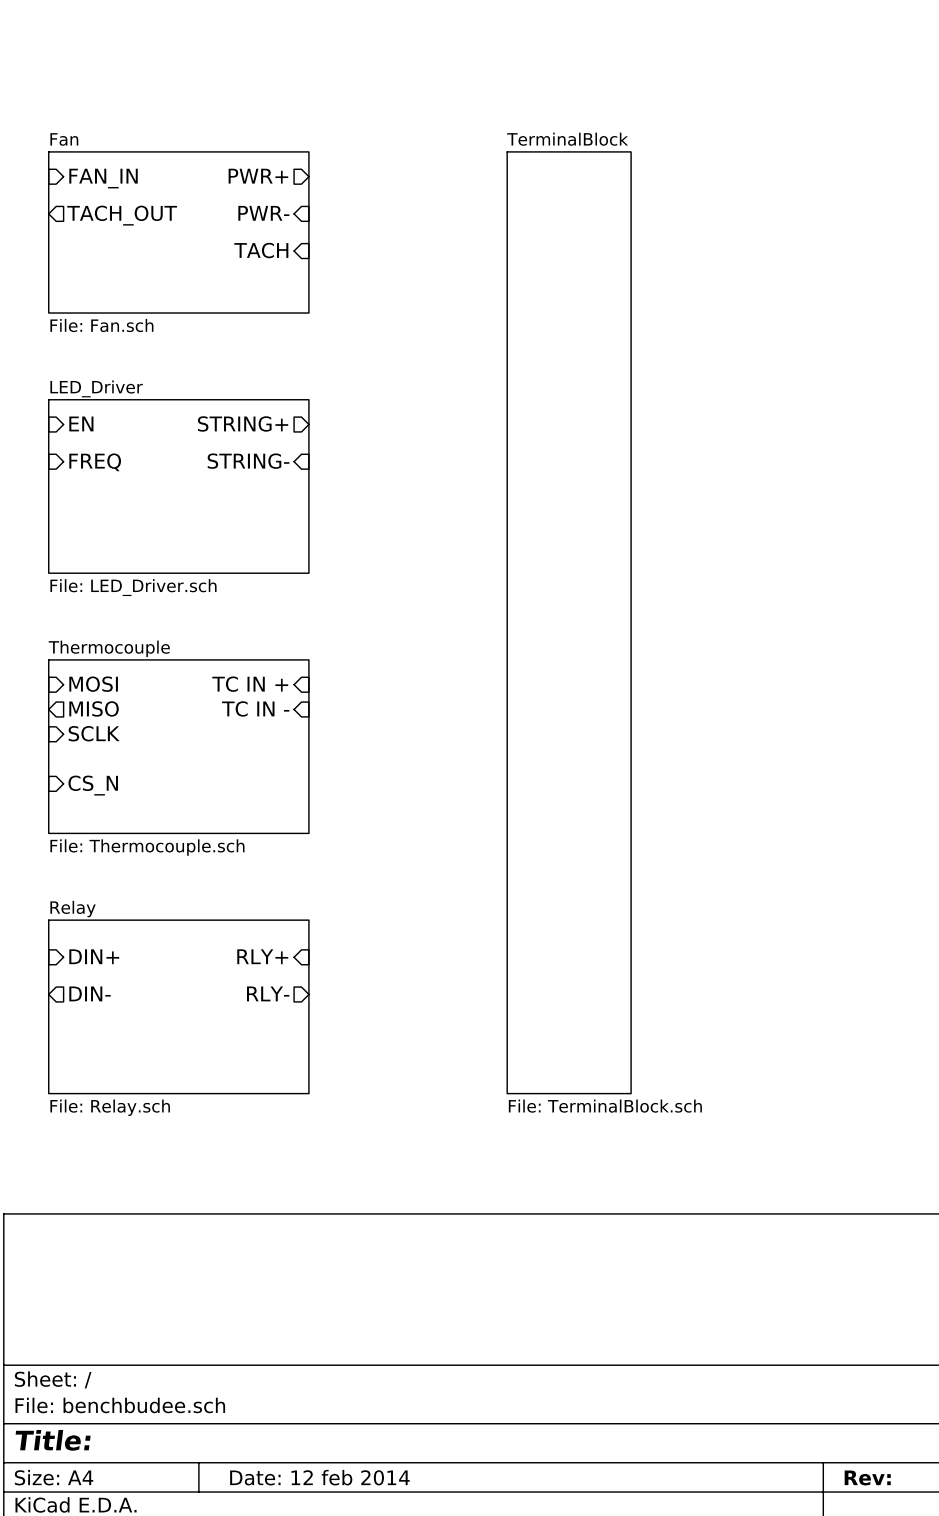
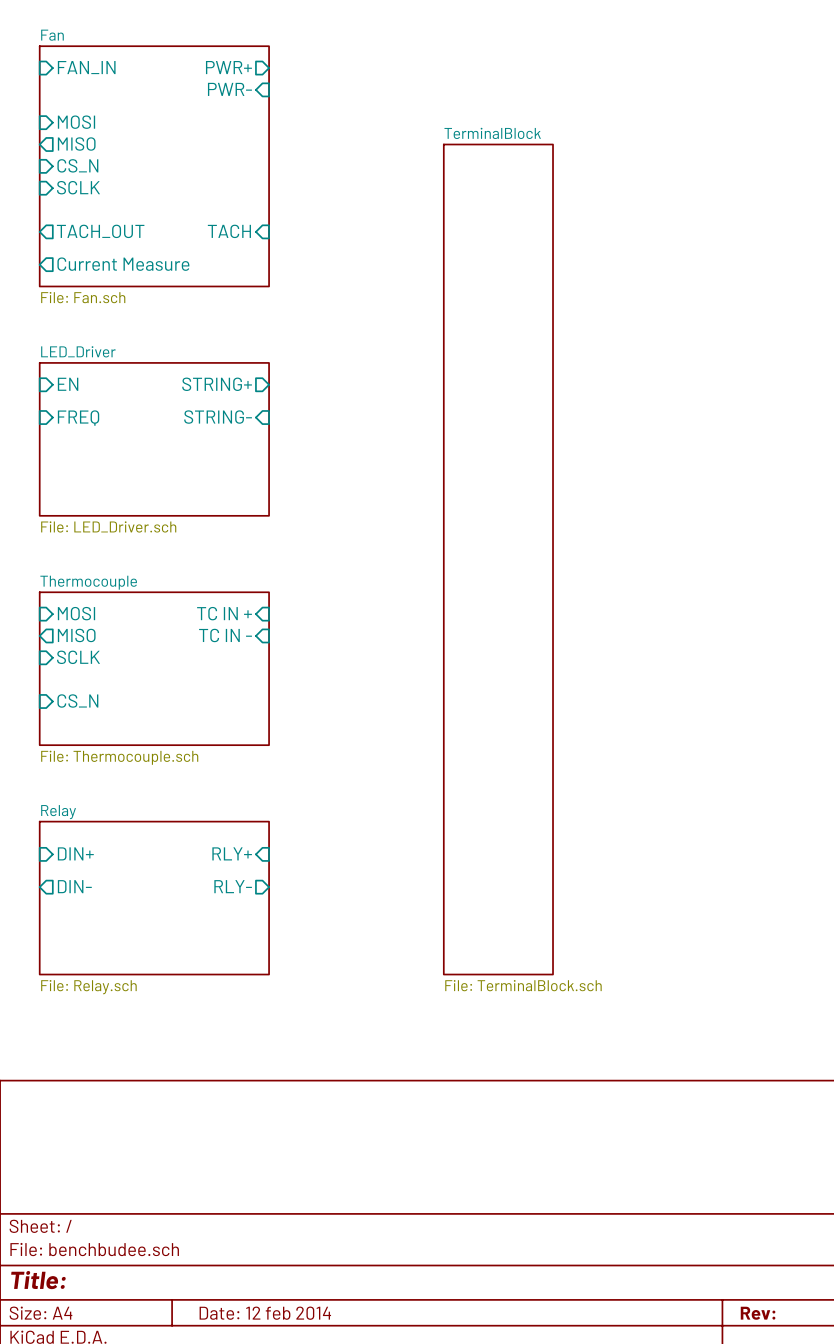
sheet pin: none -> FAN_IN (86, 67)
sheet pin: none -> MOSI (76, 122)
sheet pin: none -> MISO (76, 144)
sheet Fan: none -> File: Fan.sch (154, 166)
sheet pin position: PWR+ (258, 176) -> PWR+ (228, 67)
sheet pin: FAN_IN (103, 178) -> CS_N (77, 165)
sheet pin: none -> SCLK (78, 187)
sheet pin position: PWR- (263, 213) -> PWR- (229, 89)
sheet pin position: TACH_OUT (122, 215) -> TACH_OUT (100, 231)
sheet Fan: File: Fan.sch (178, 232) -> none
sheet pin: none -> Current Measure (123, 264)

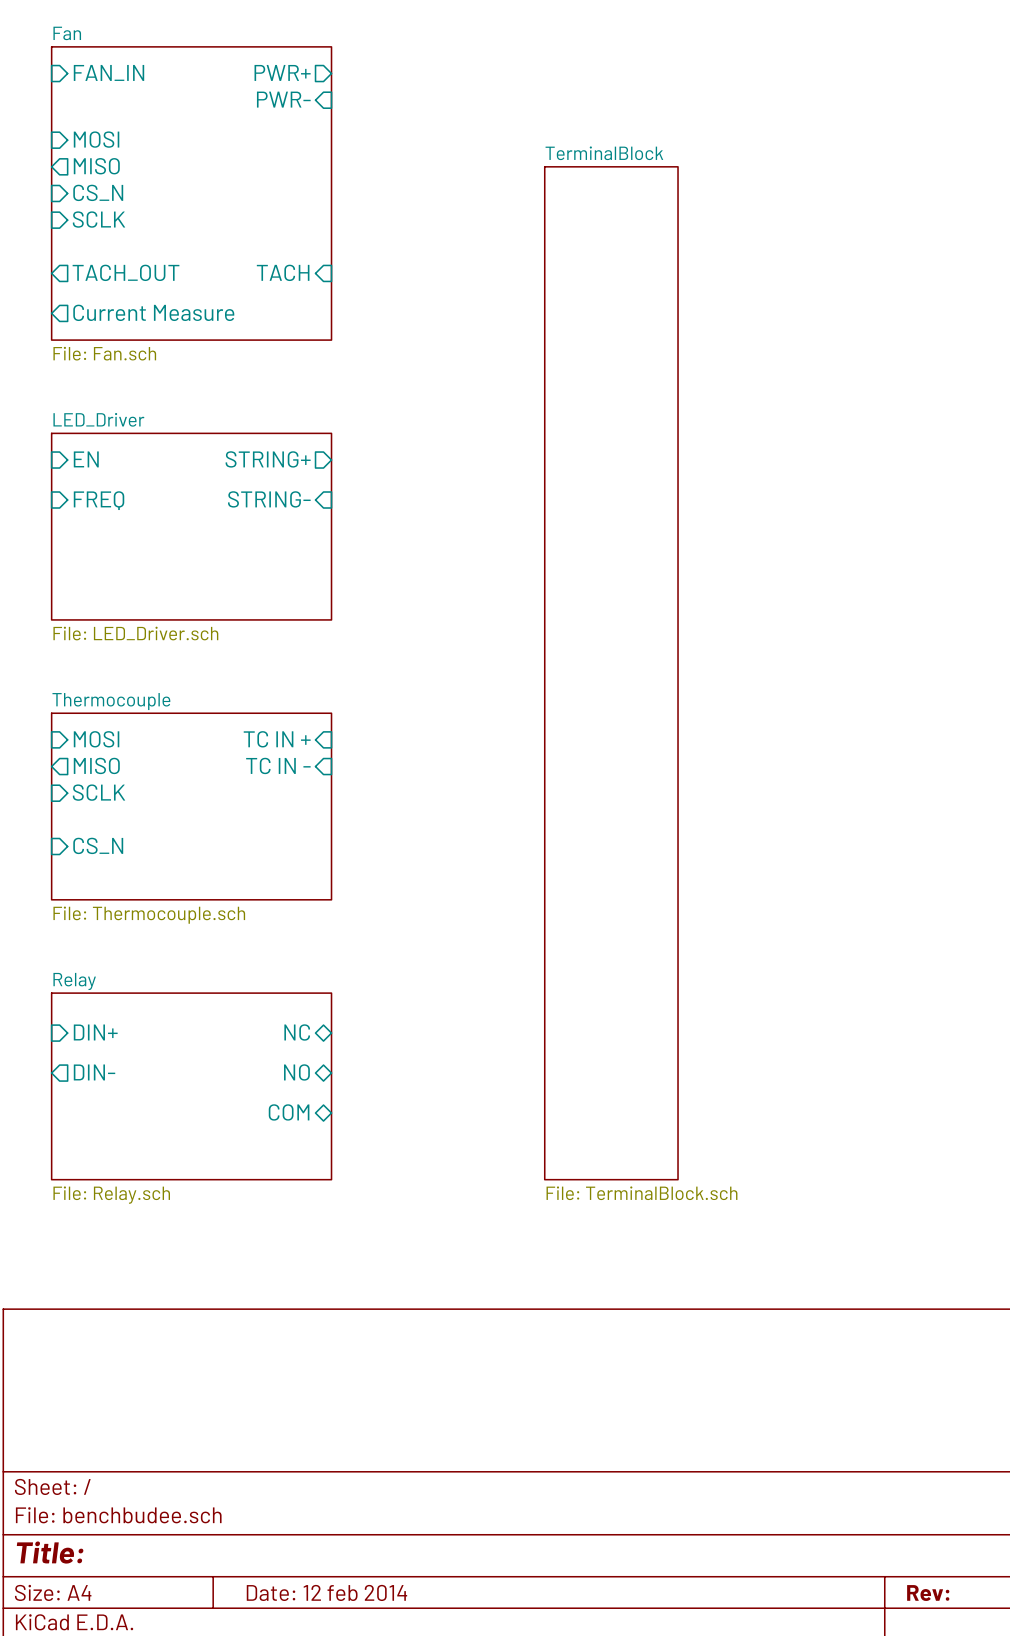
sheet pin shape: input (232, 853) -> bidirectional (297, 1032)
sheet pin: RLY+ (232, 853) -> NC (297, 1032)
sheet pin shape: output (233, 886) -> bidirectional (296, 1072)
sheet pin: RLY- (233, 886) -> NO (296, 1072)
sheet pin: none -> COM (289, 1112)

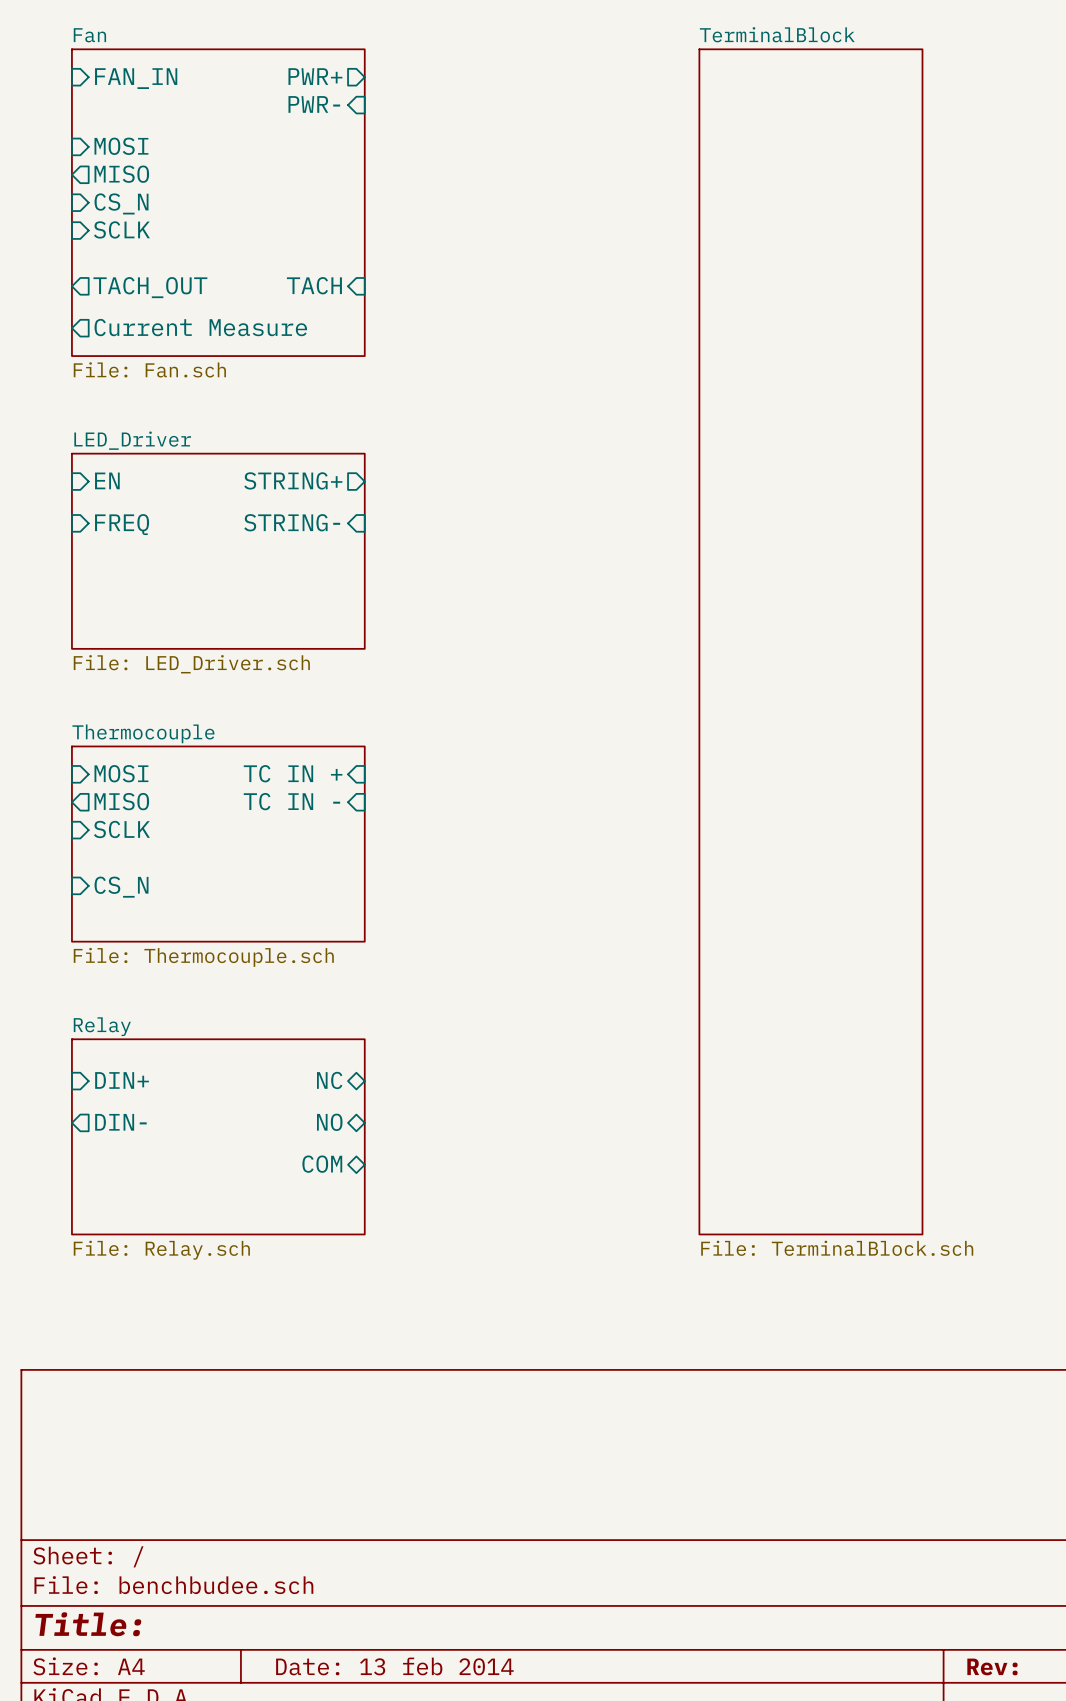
sheet TerminalBlock: none -> File: TerminalBlock.sch (810, 641)
sheet TerminalBlock: File: TerminalBlock.sch (611, 673) -> none
title block: Date: 12 feb 2014 (326, 1592) -> Date: 13 feb 2014 (394, 1666)

